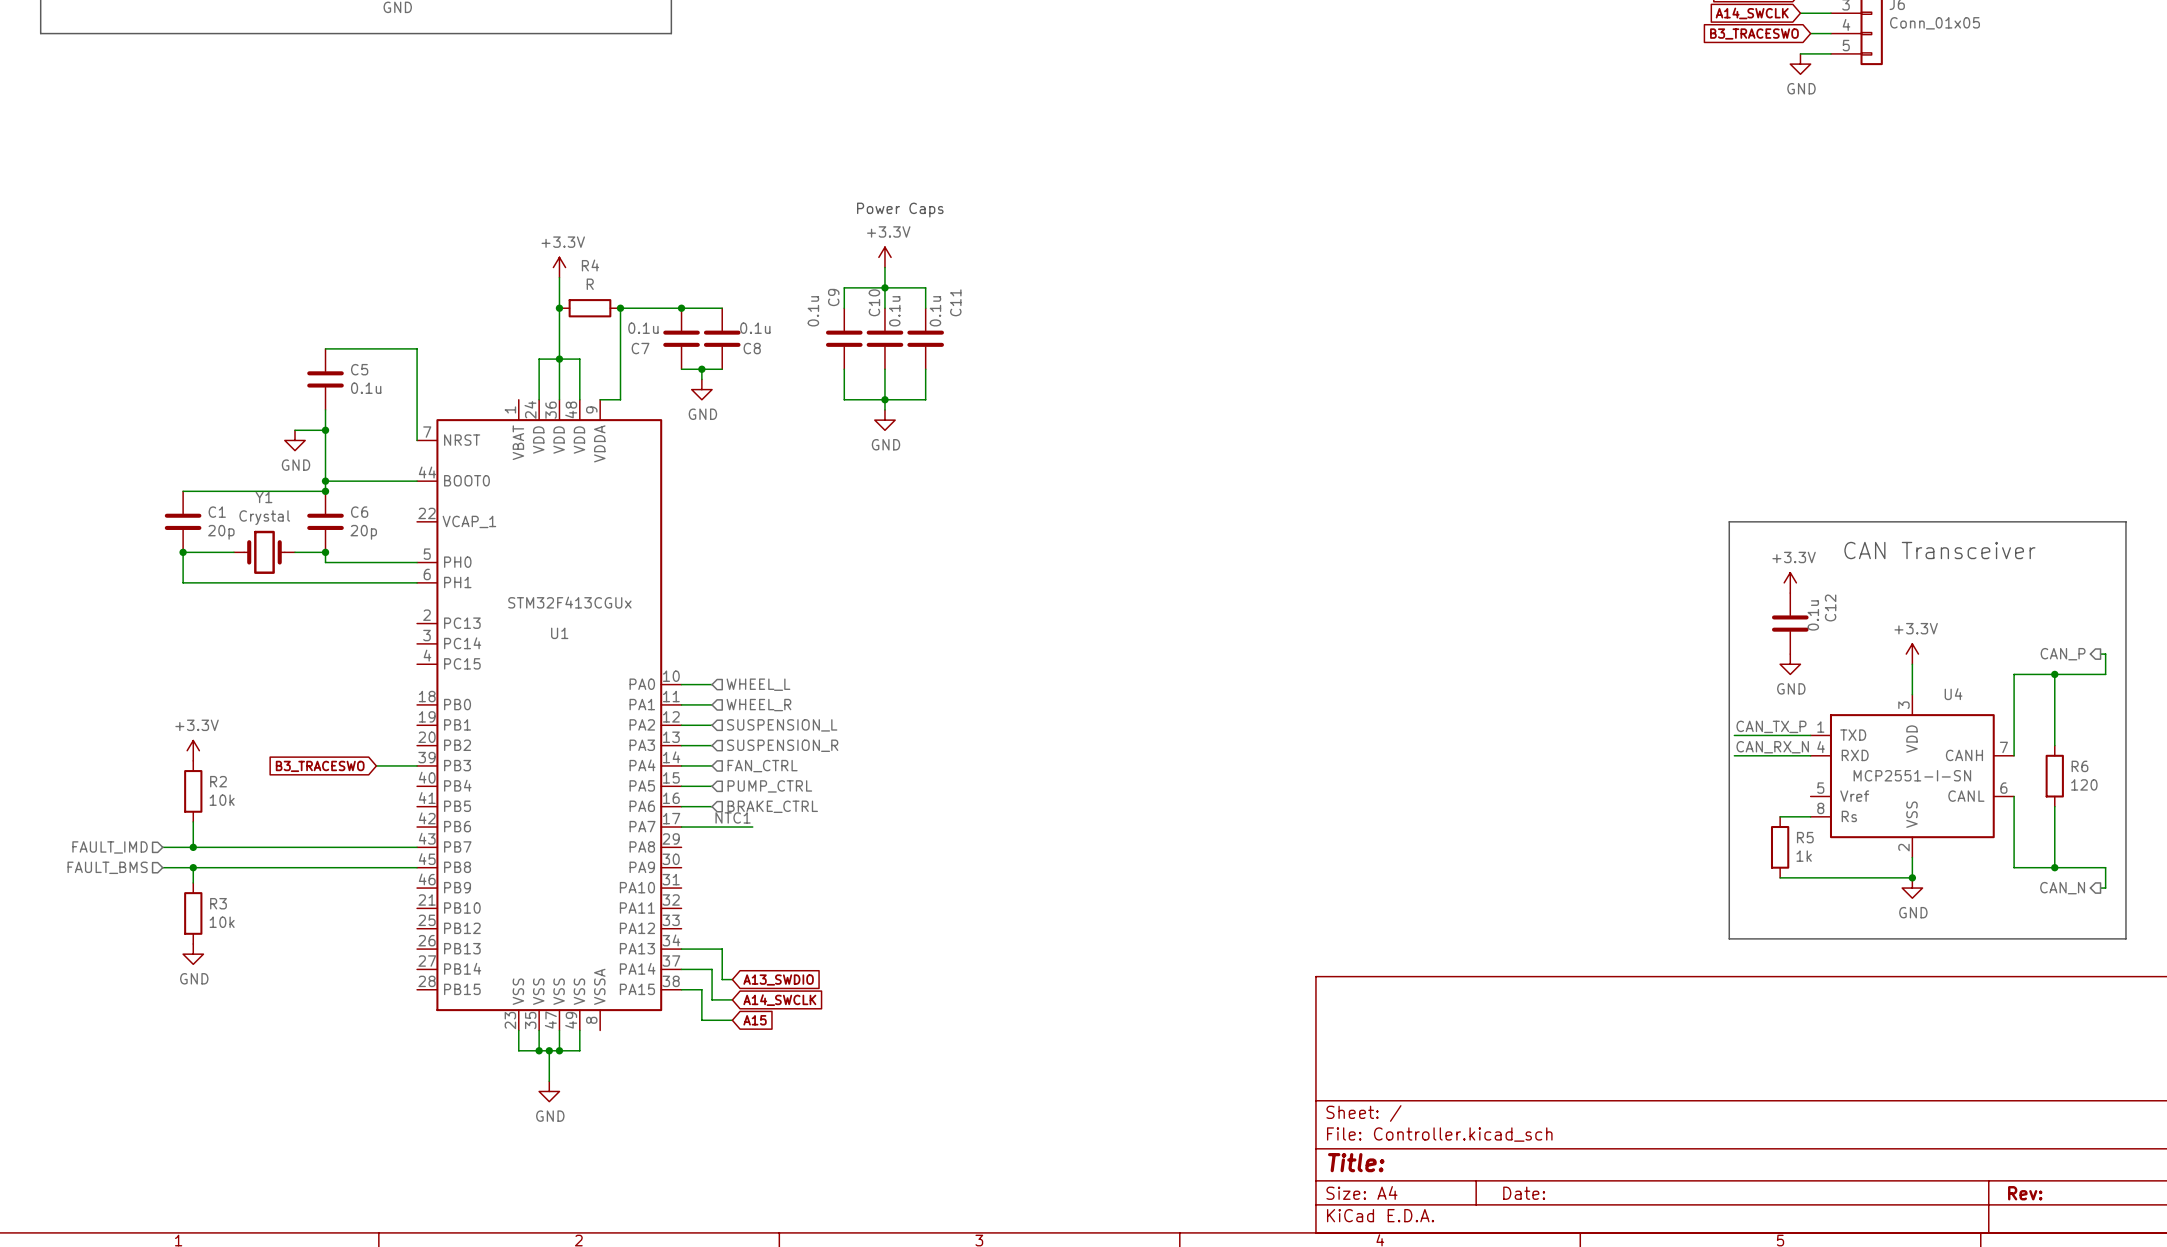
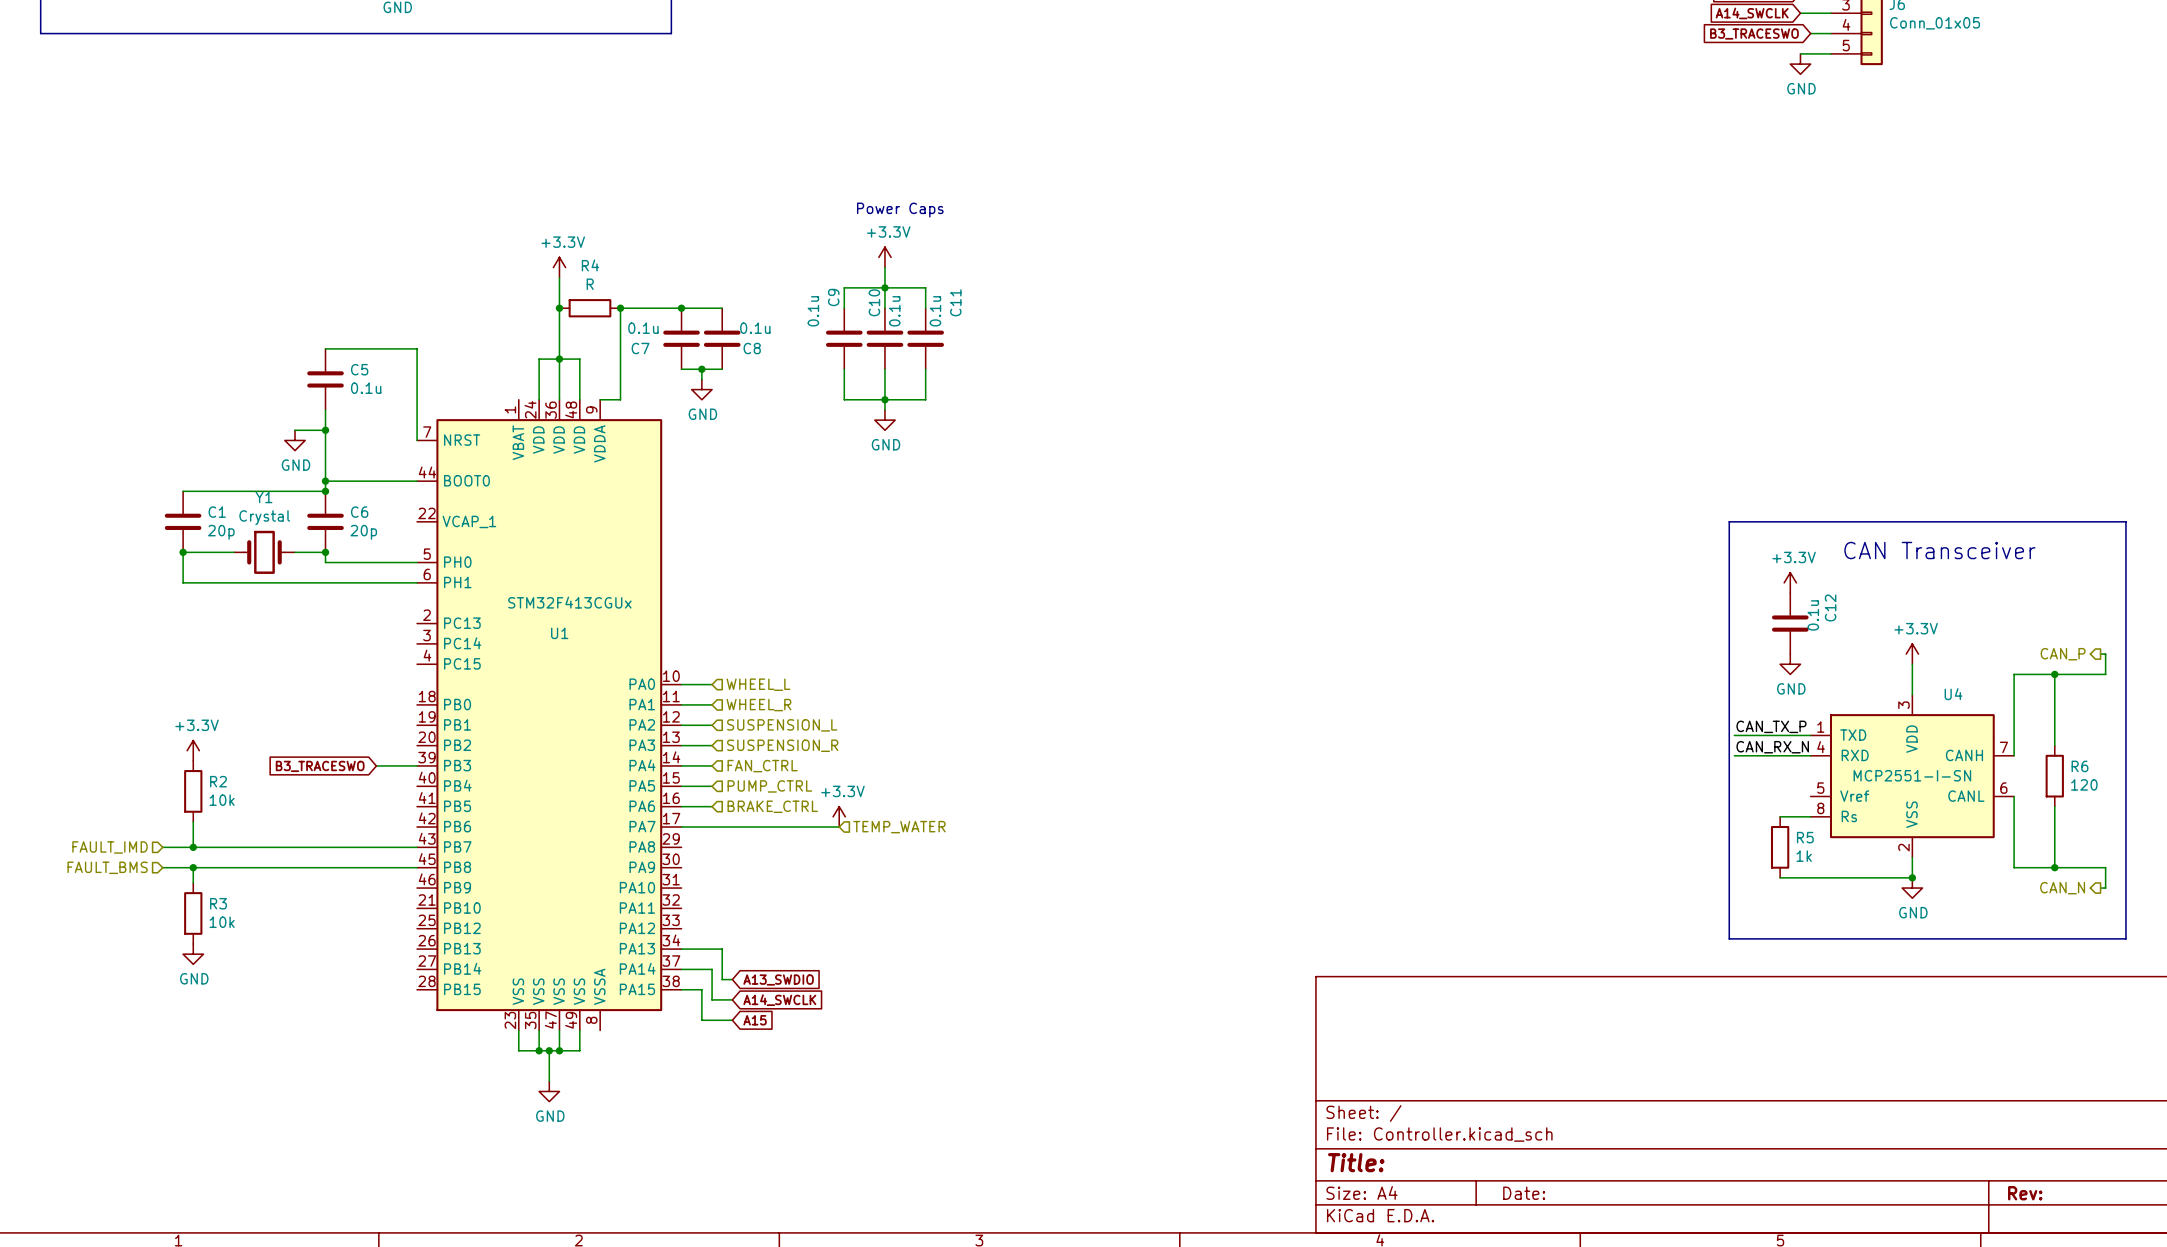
power symbol: none -> +3.3V (839, 816)
label: NTC1 (733, 817) -> none
wire: none -> (752, 827) (839, 827)
hierarchical label: none -> TEMP_WATER (899, 827)

